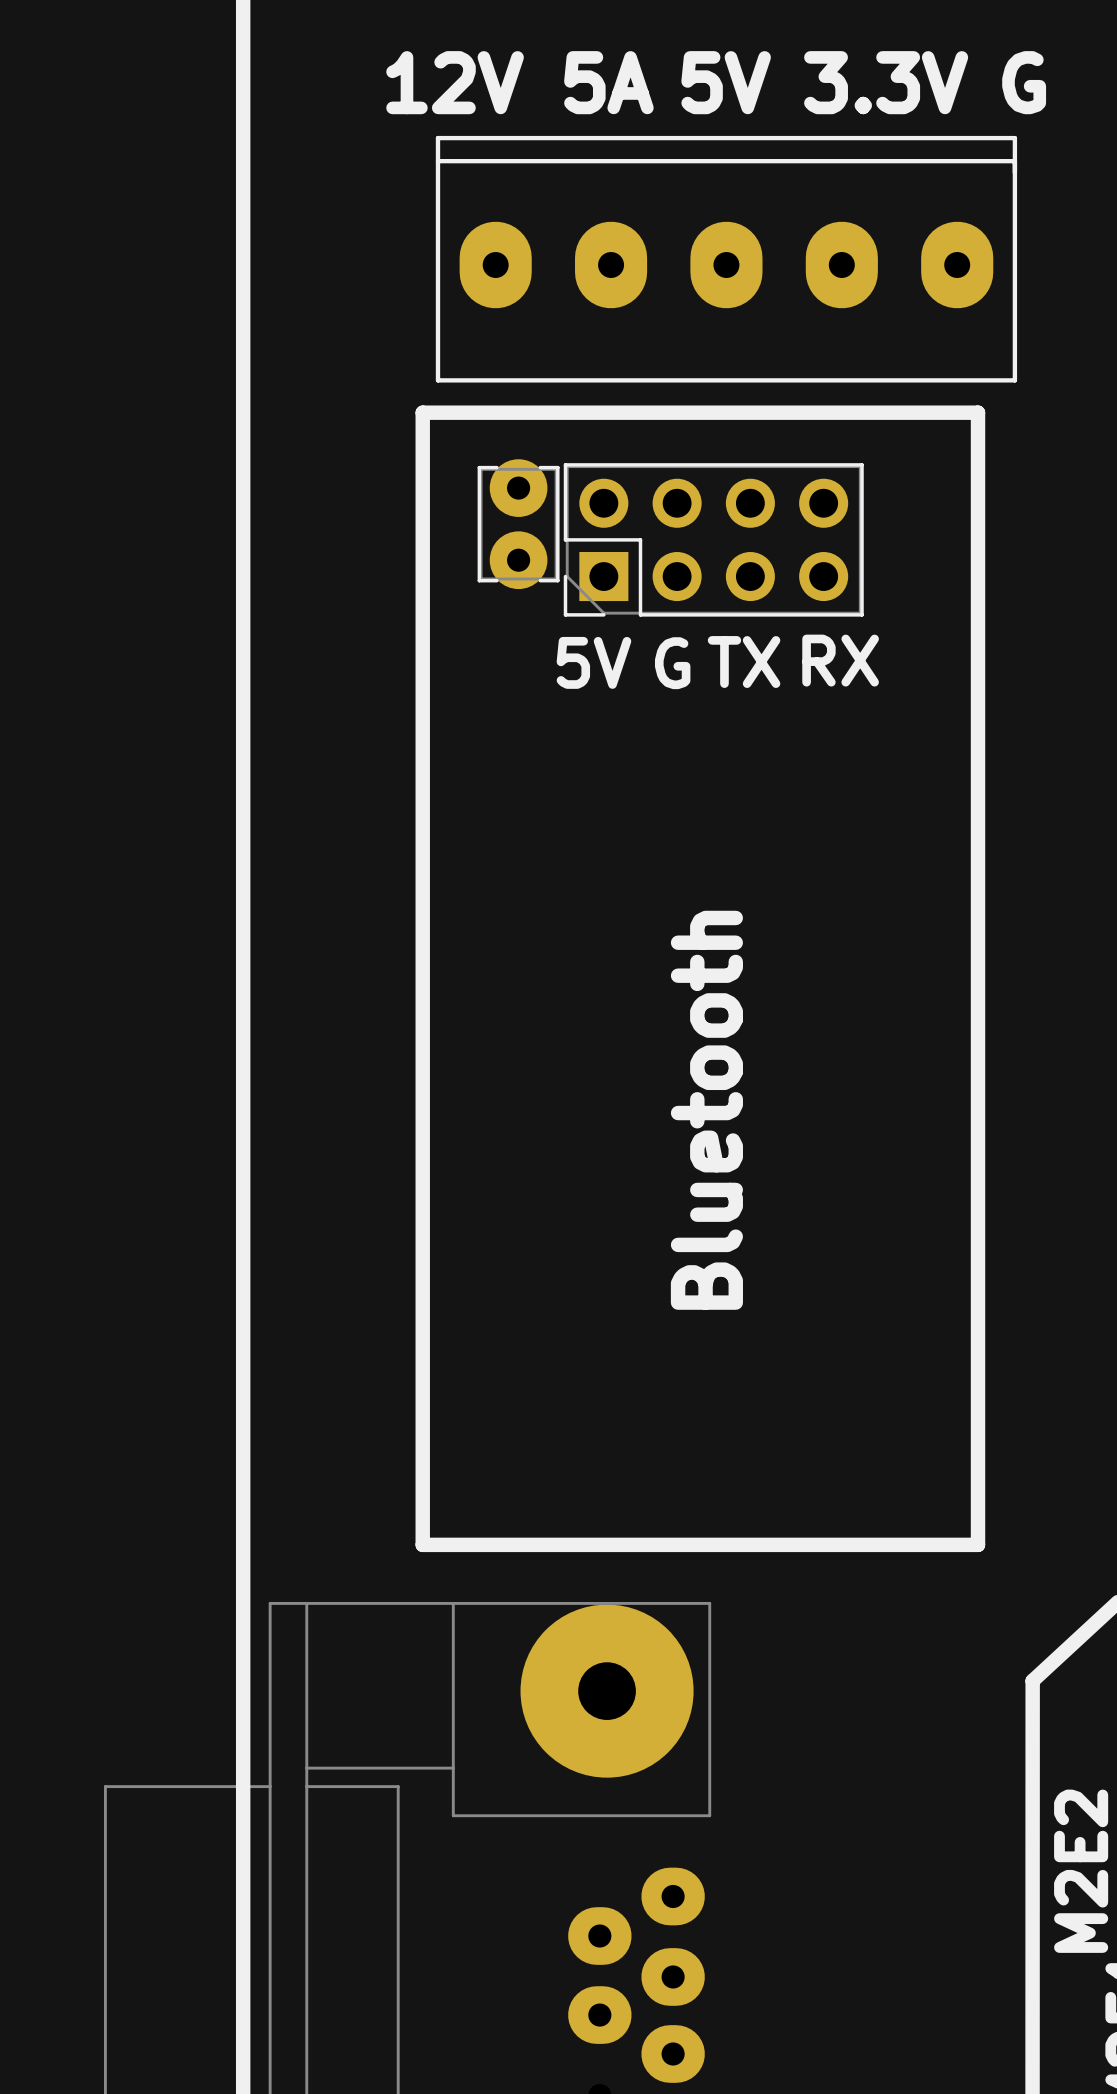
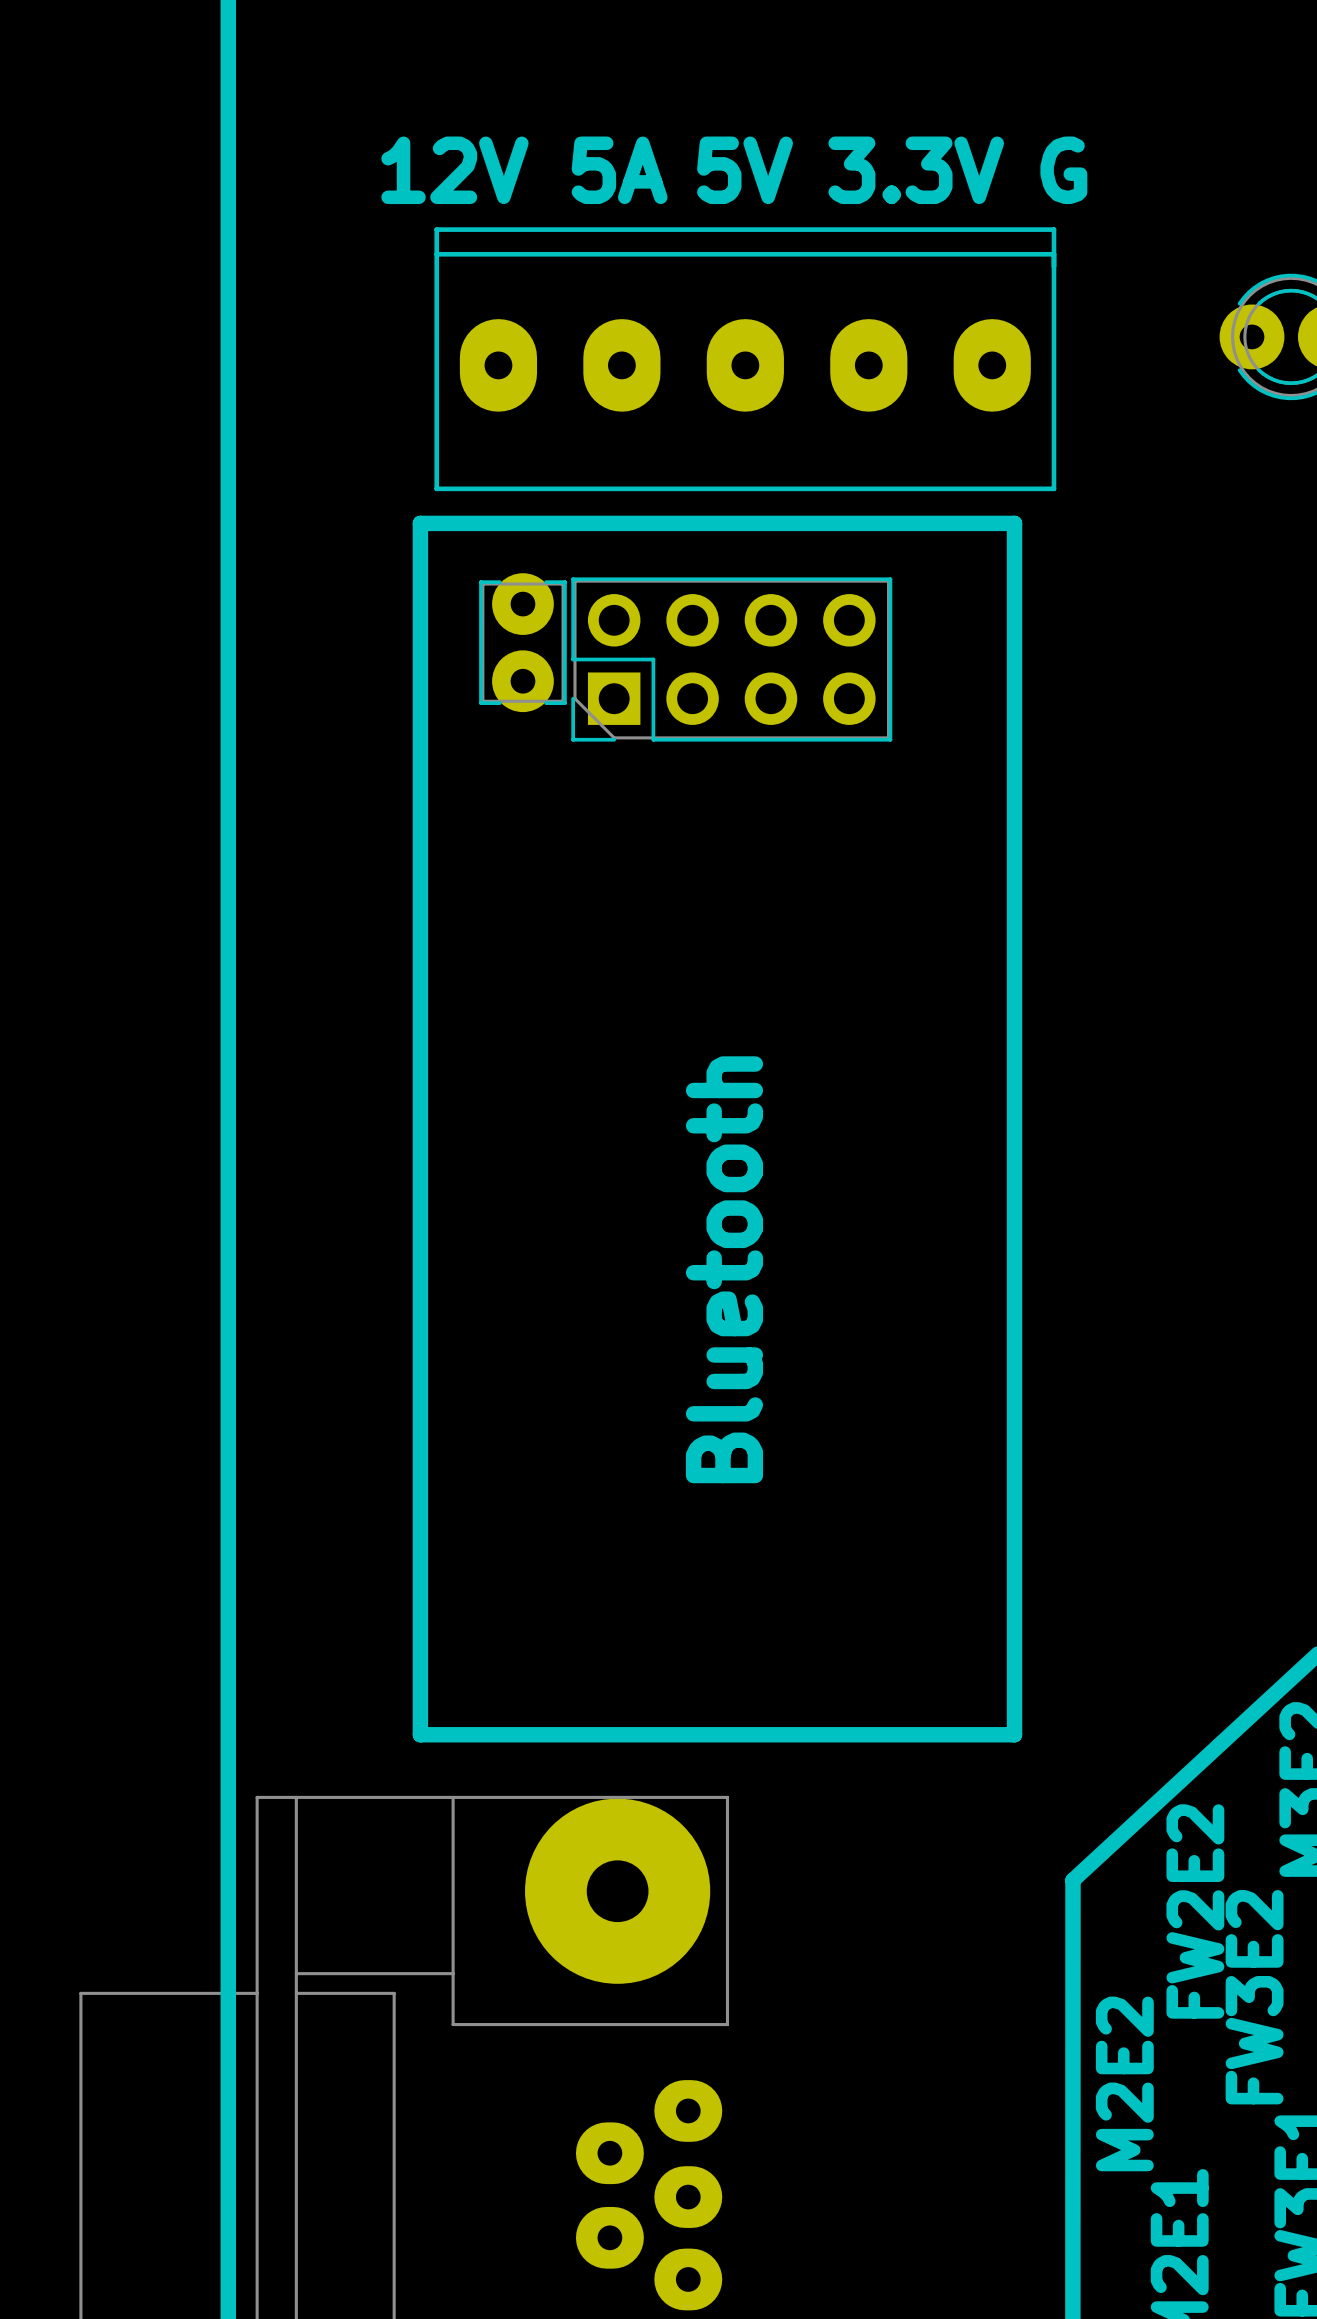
text: RX (840, 660) -> none
text: 5V (593, 662) -> none
text: TX (744, 662) -> none
text: G (672, 663) -> none

